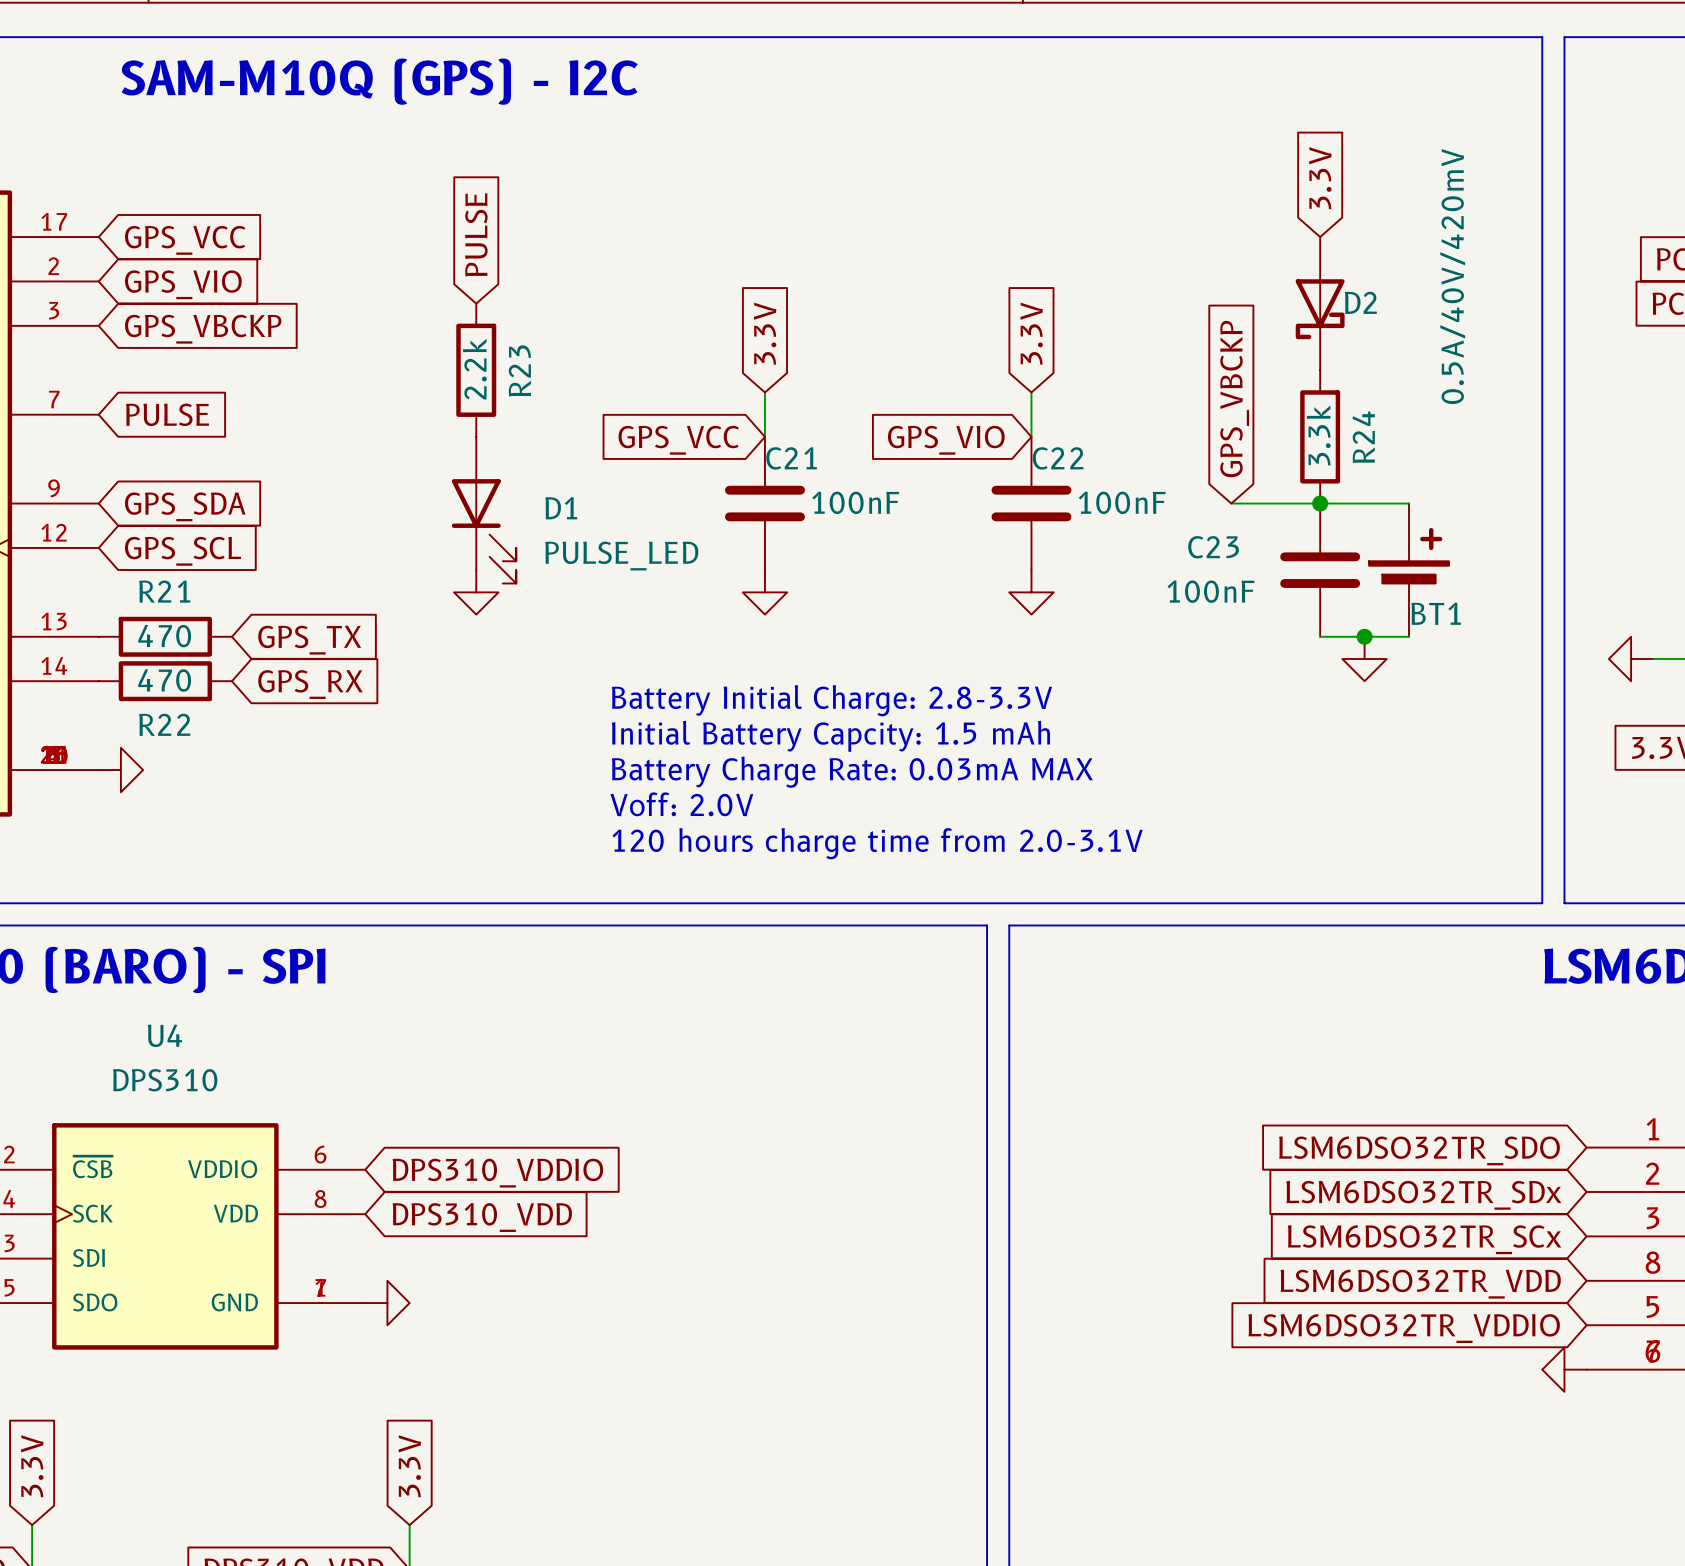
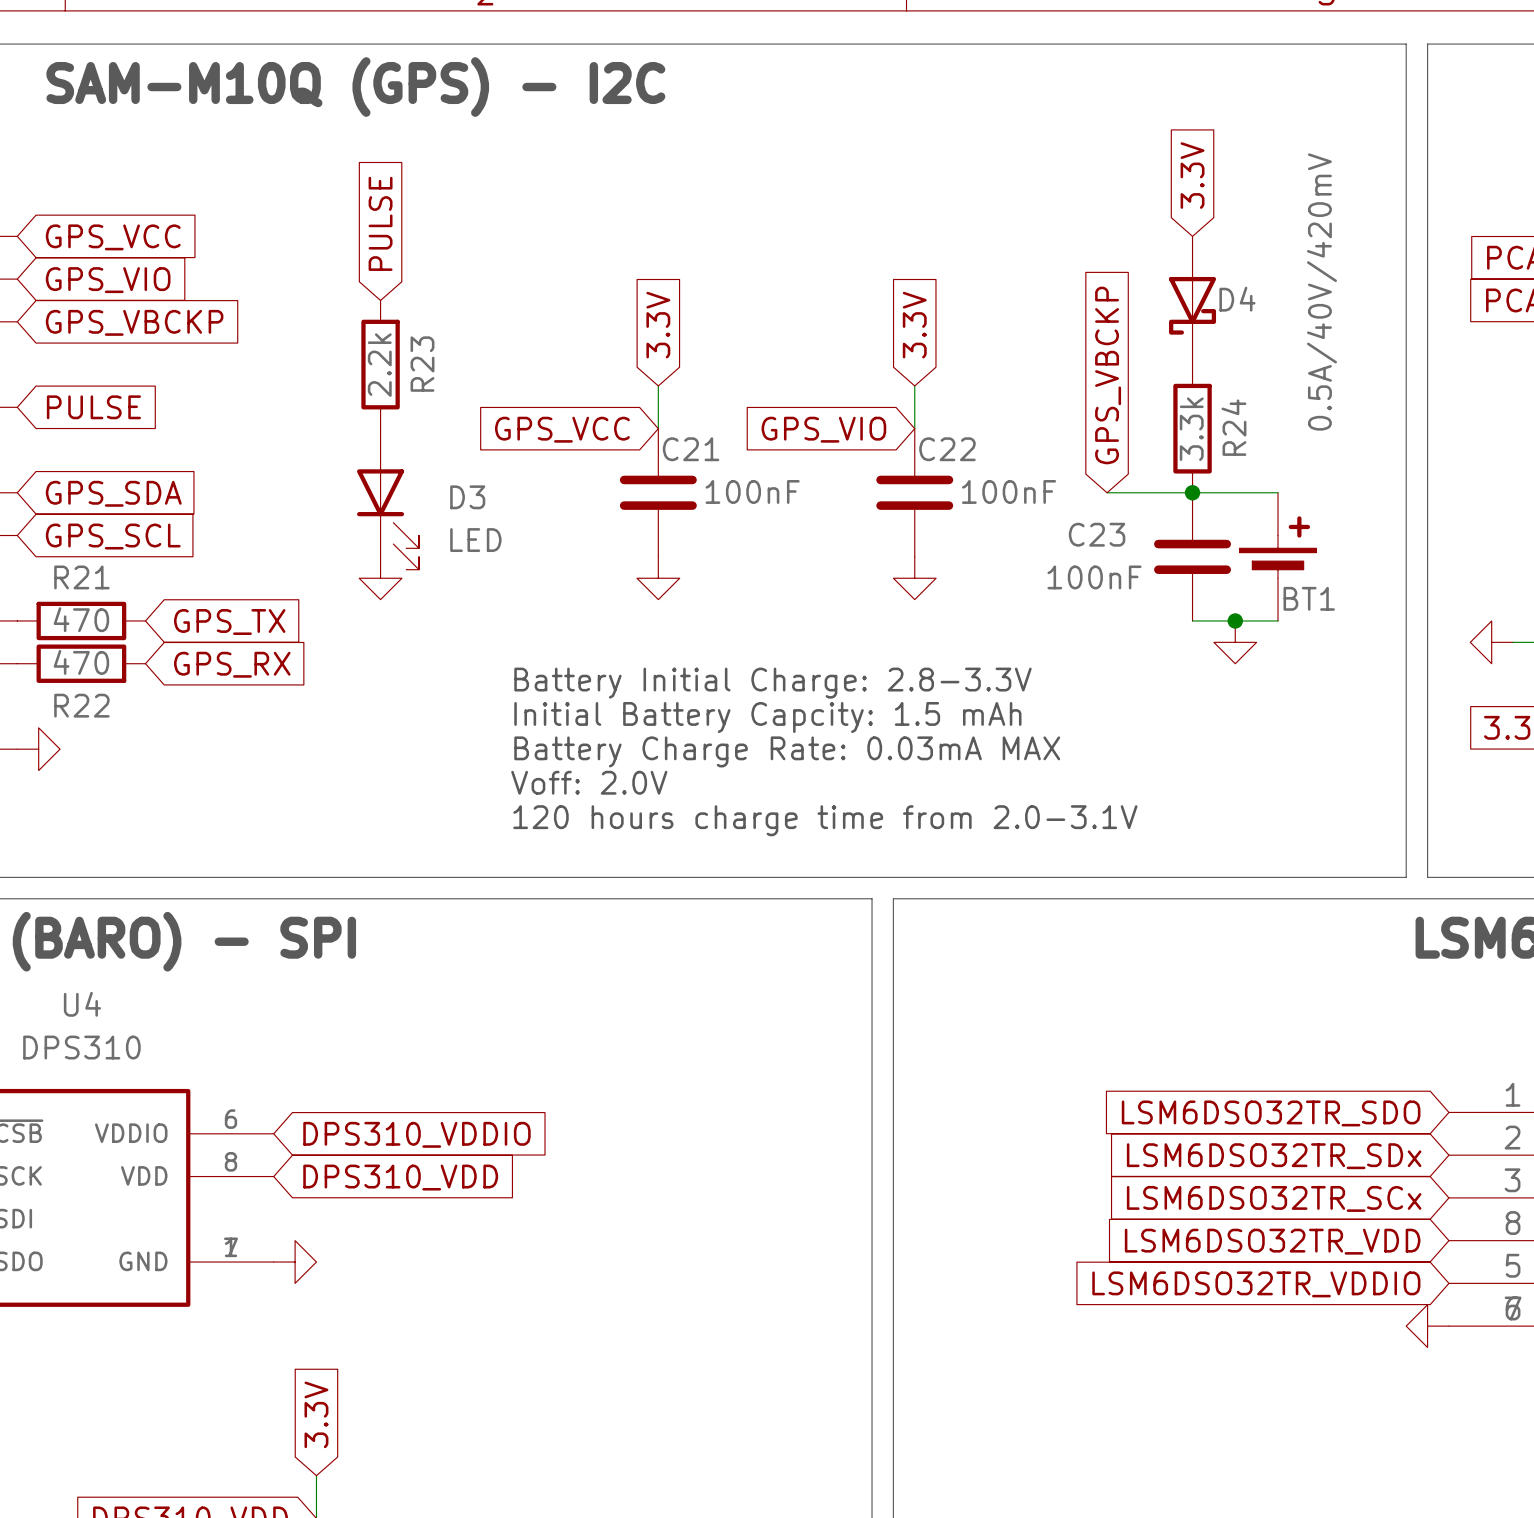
D2 name: D2 (1360, 302) -> D4 (1237, 299)
D1 name: D1 (561, 508) -> D3 (467, 497)
D1 value: PULSE_LED (621, 555) -> LED (475, 540)

